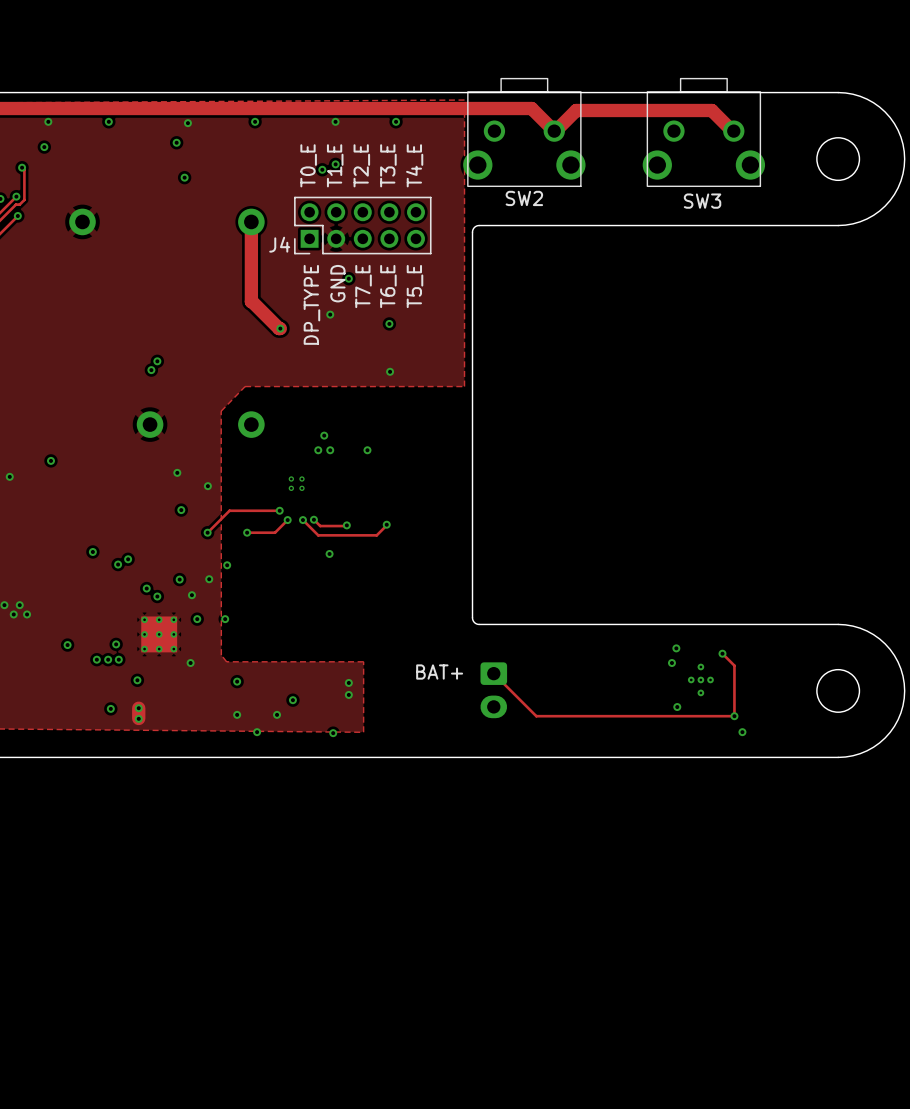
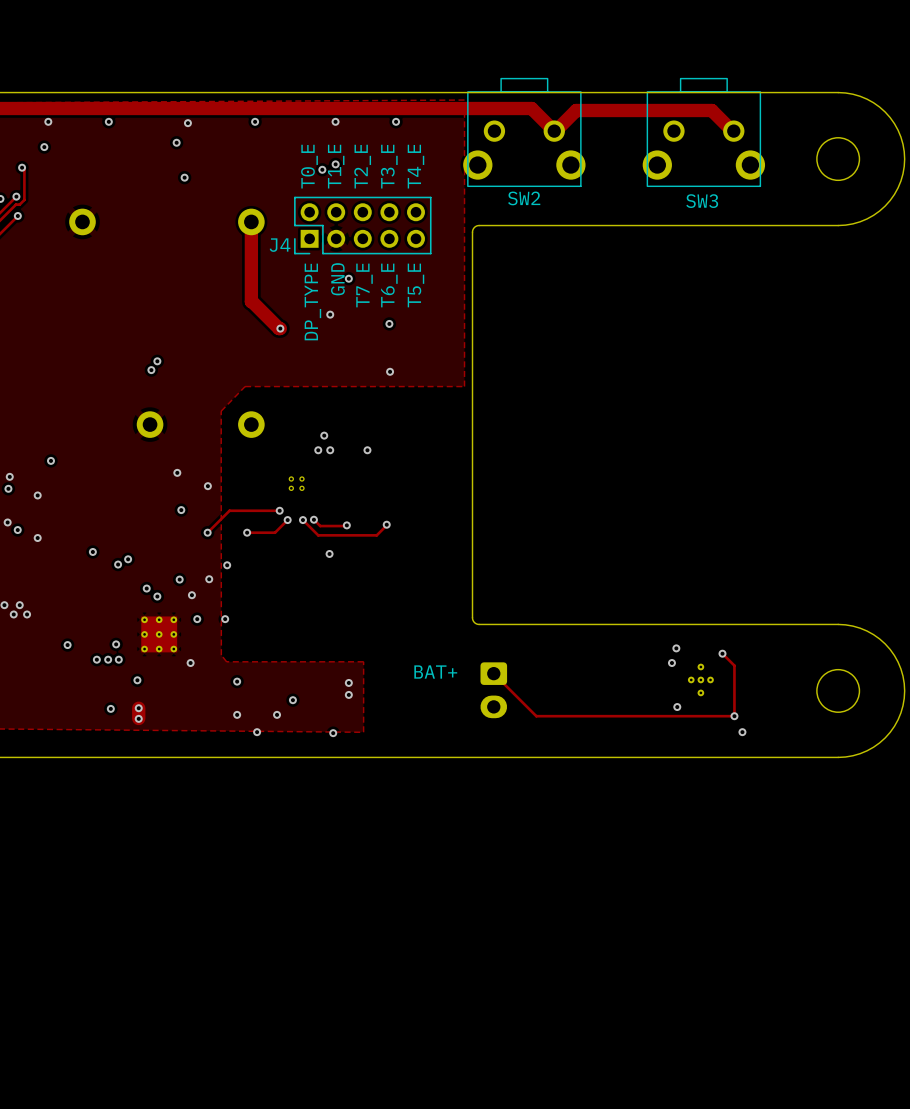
via: none -> (8, 488)
via: none -> (37, 495)
via: none -> (7, 522)
via: none -> (17, 530)
via: none -> (37, 538)

